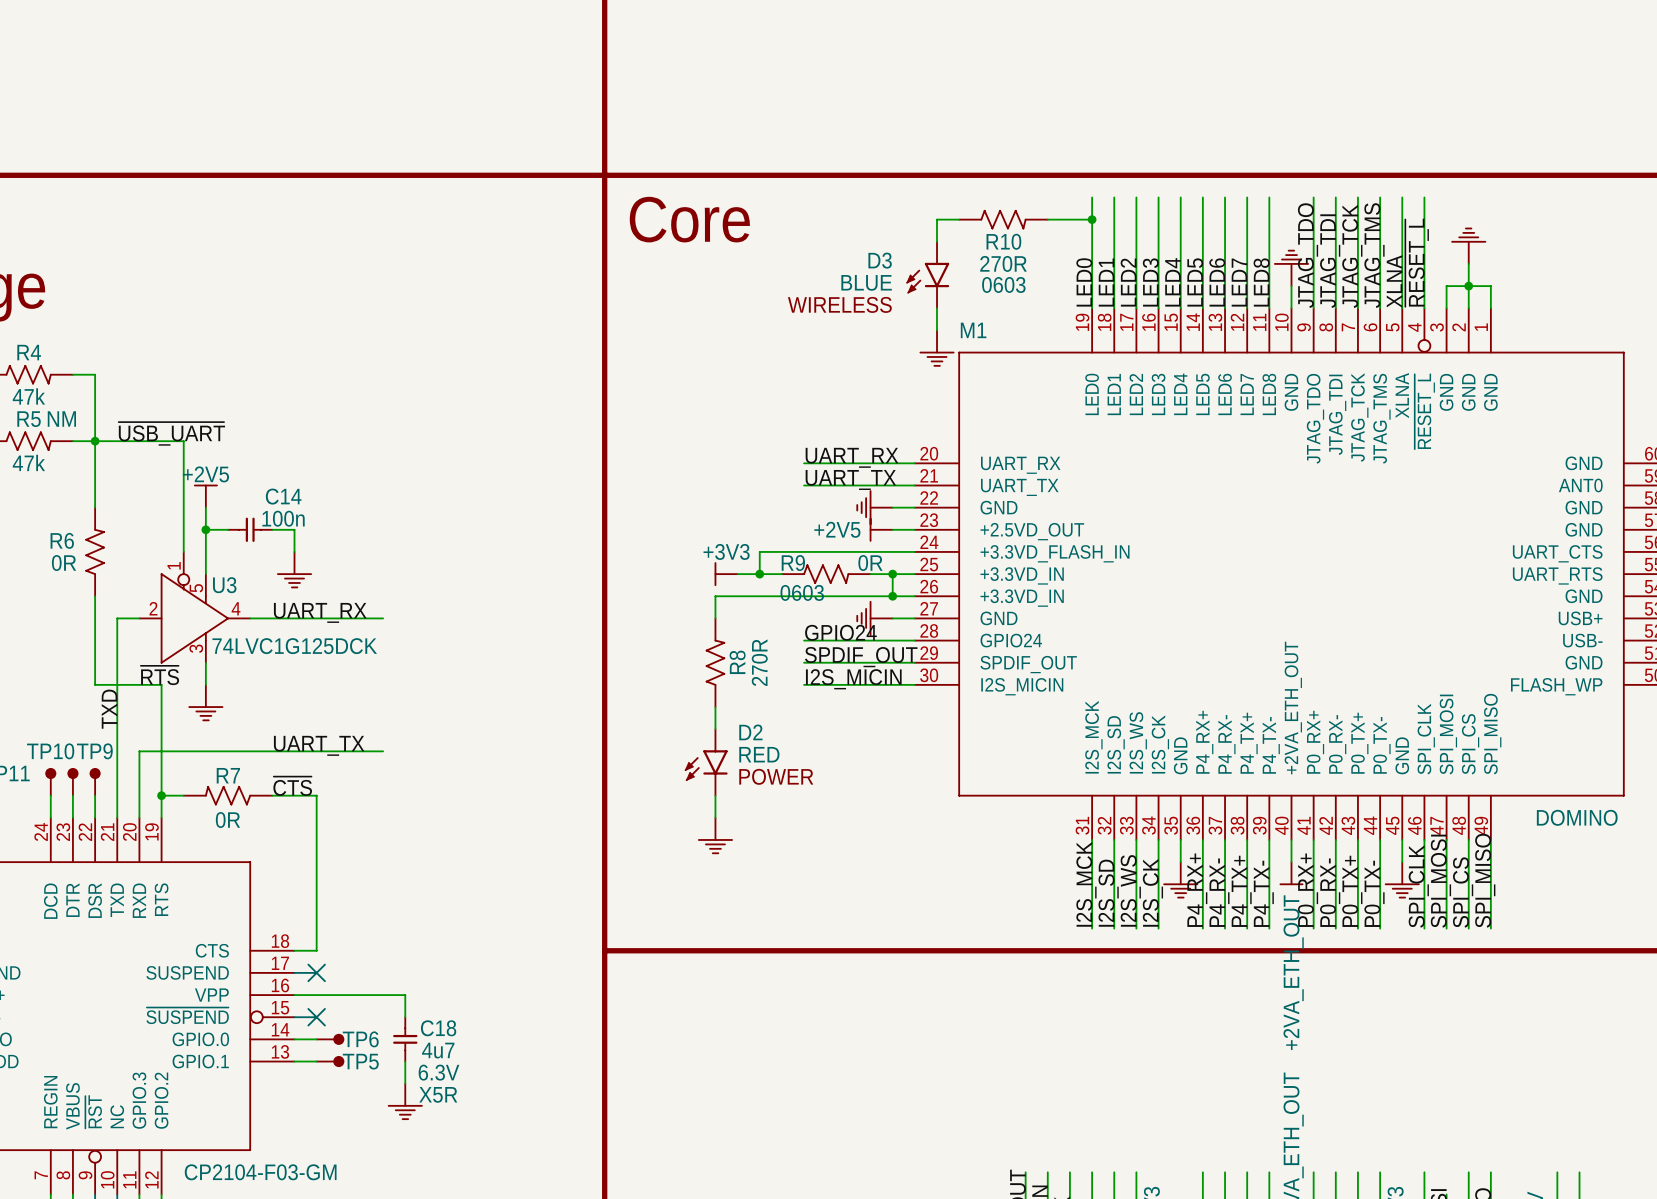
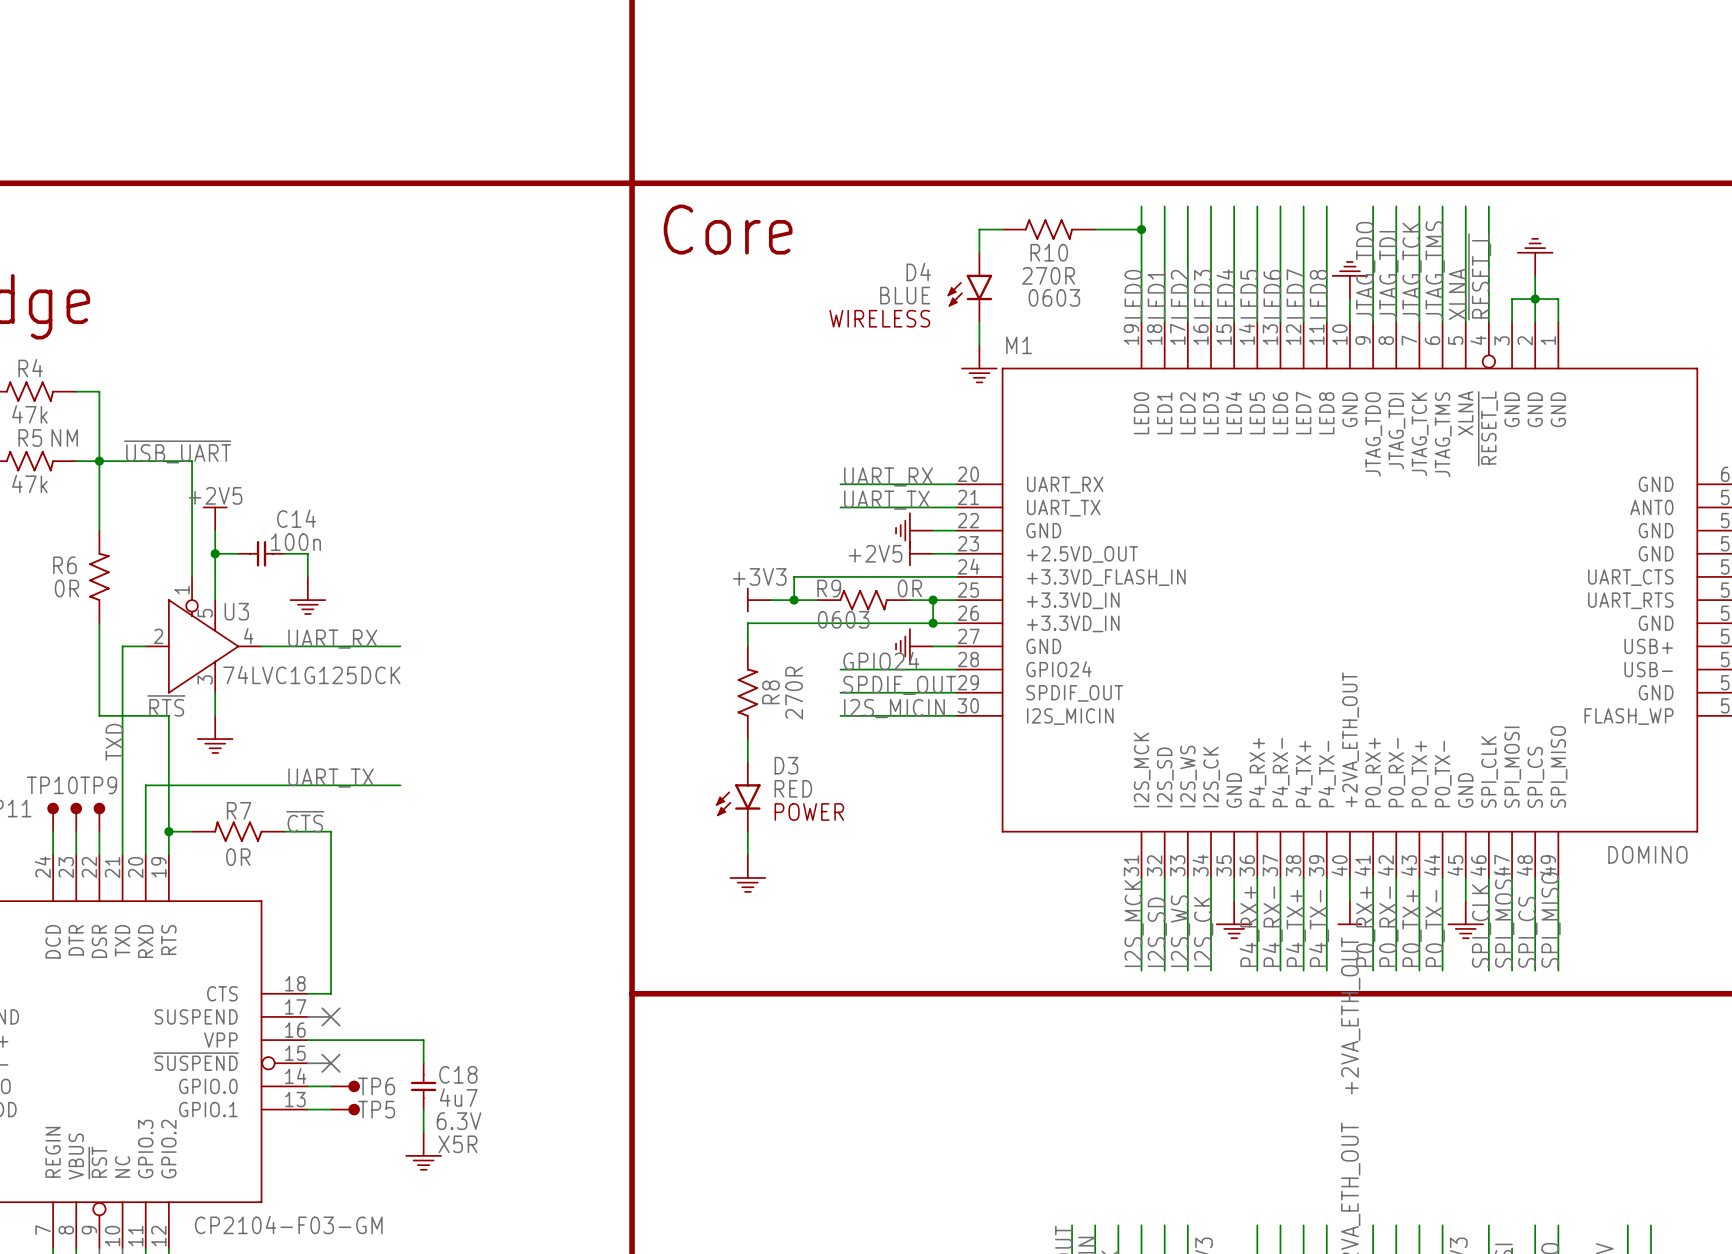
D3 name: D3 (880, 260) -> D4 (918, 272)
D2 name: D2 (750, 732) -> D3 (786, 765)

